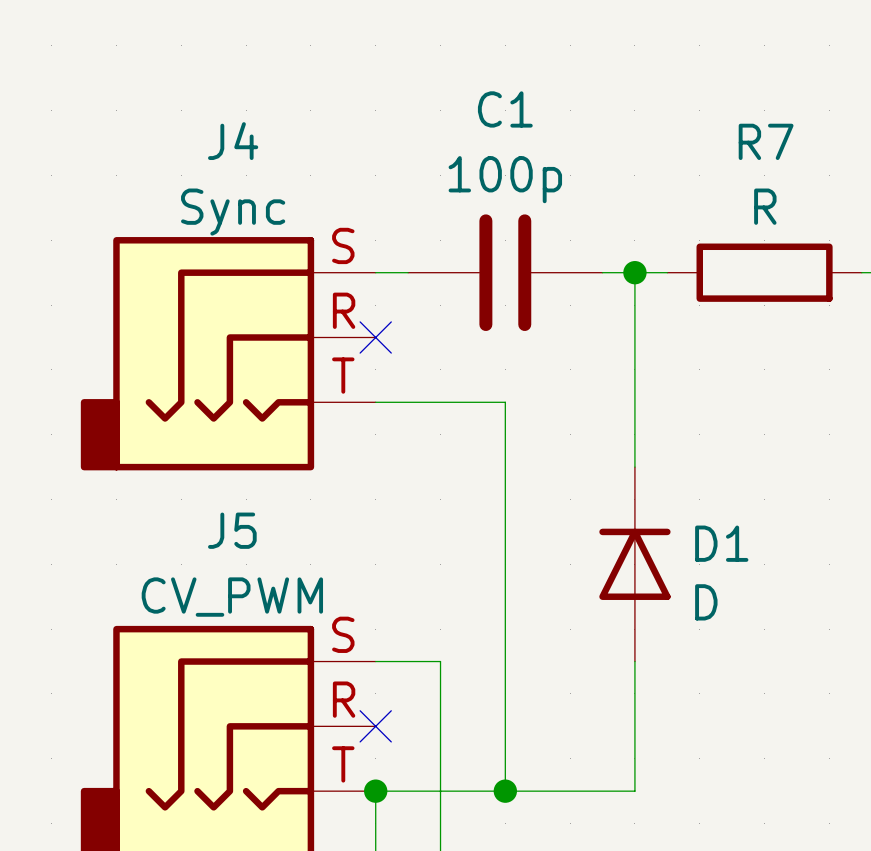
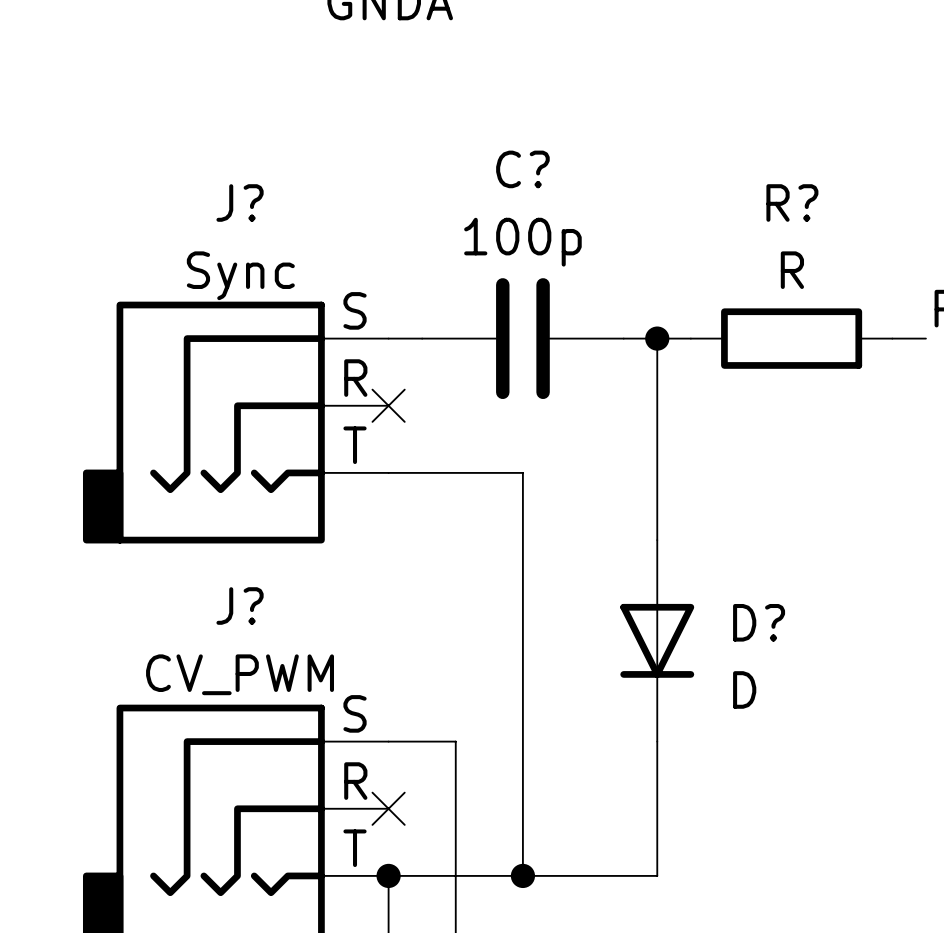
C1 name: C1 (505, 109) -> C? (522, 169)
J4 name: J4 (233, 141) -> J? (240, 203)
R7 name: R7 (766, 141) -> R? (792, 203)
J5 name: J5 (232, 530) -> J? (240, 606)
D1: D (634, 564) -> none
D?: none -> D (657, 640)

